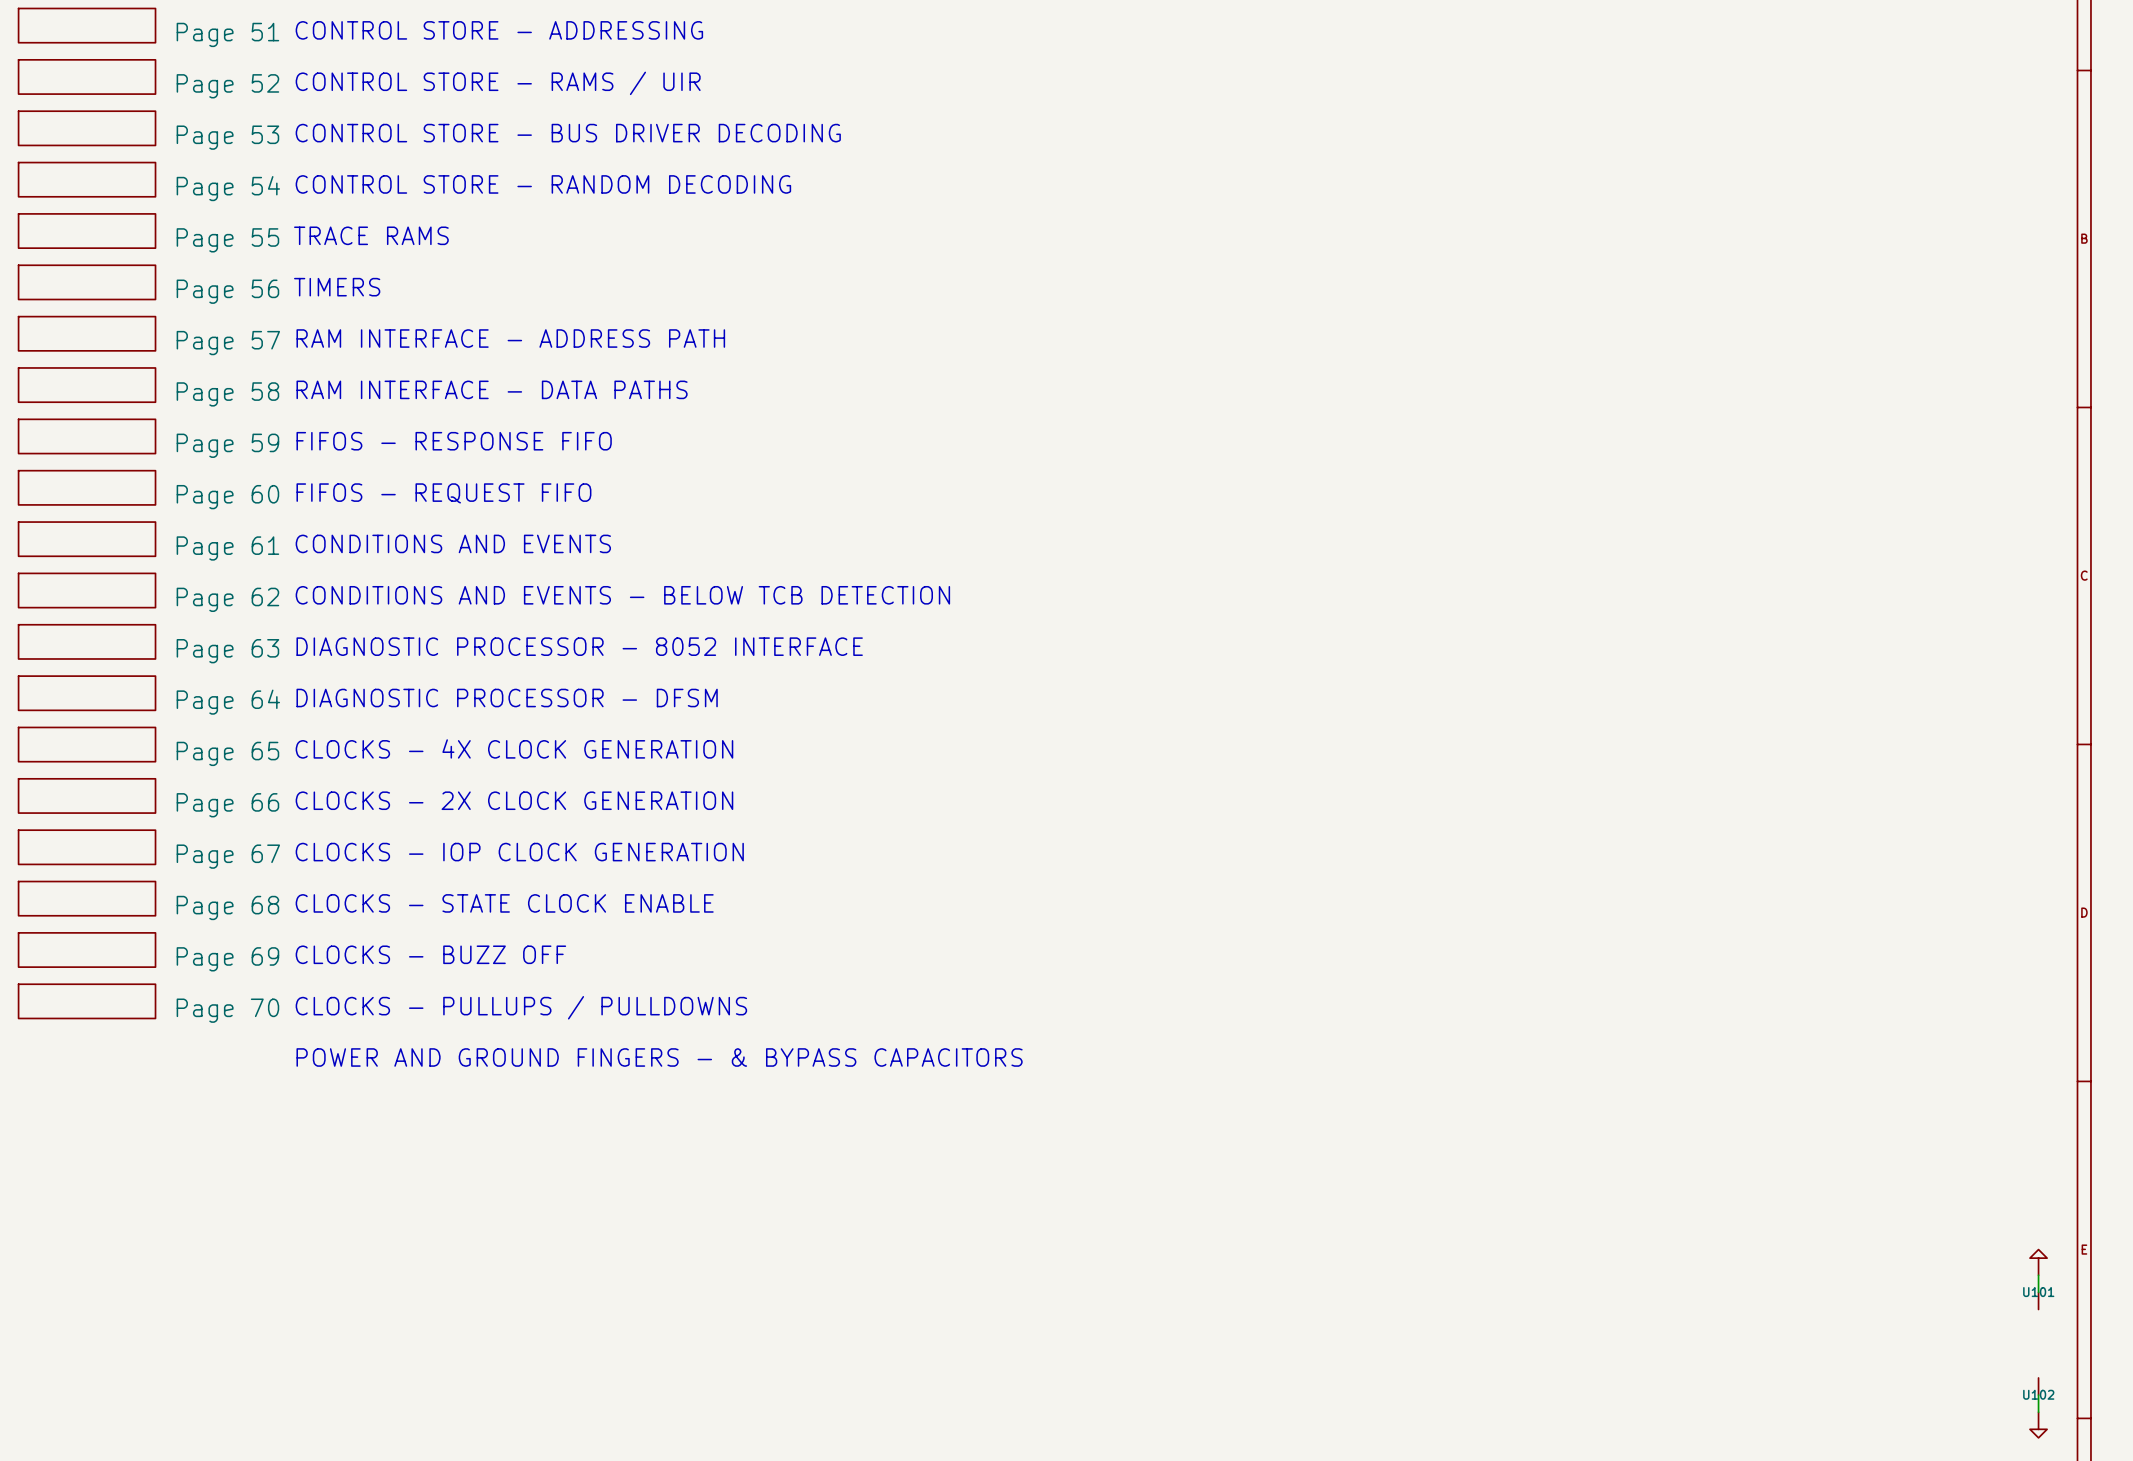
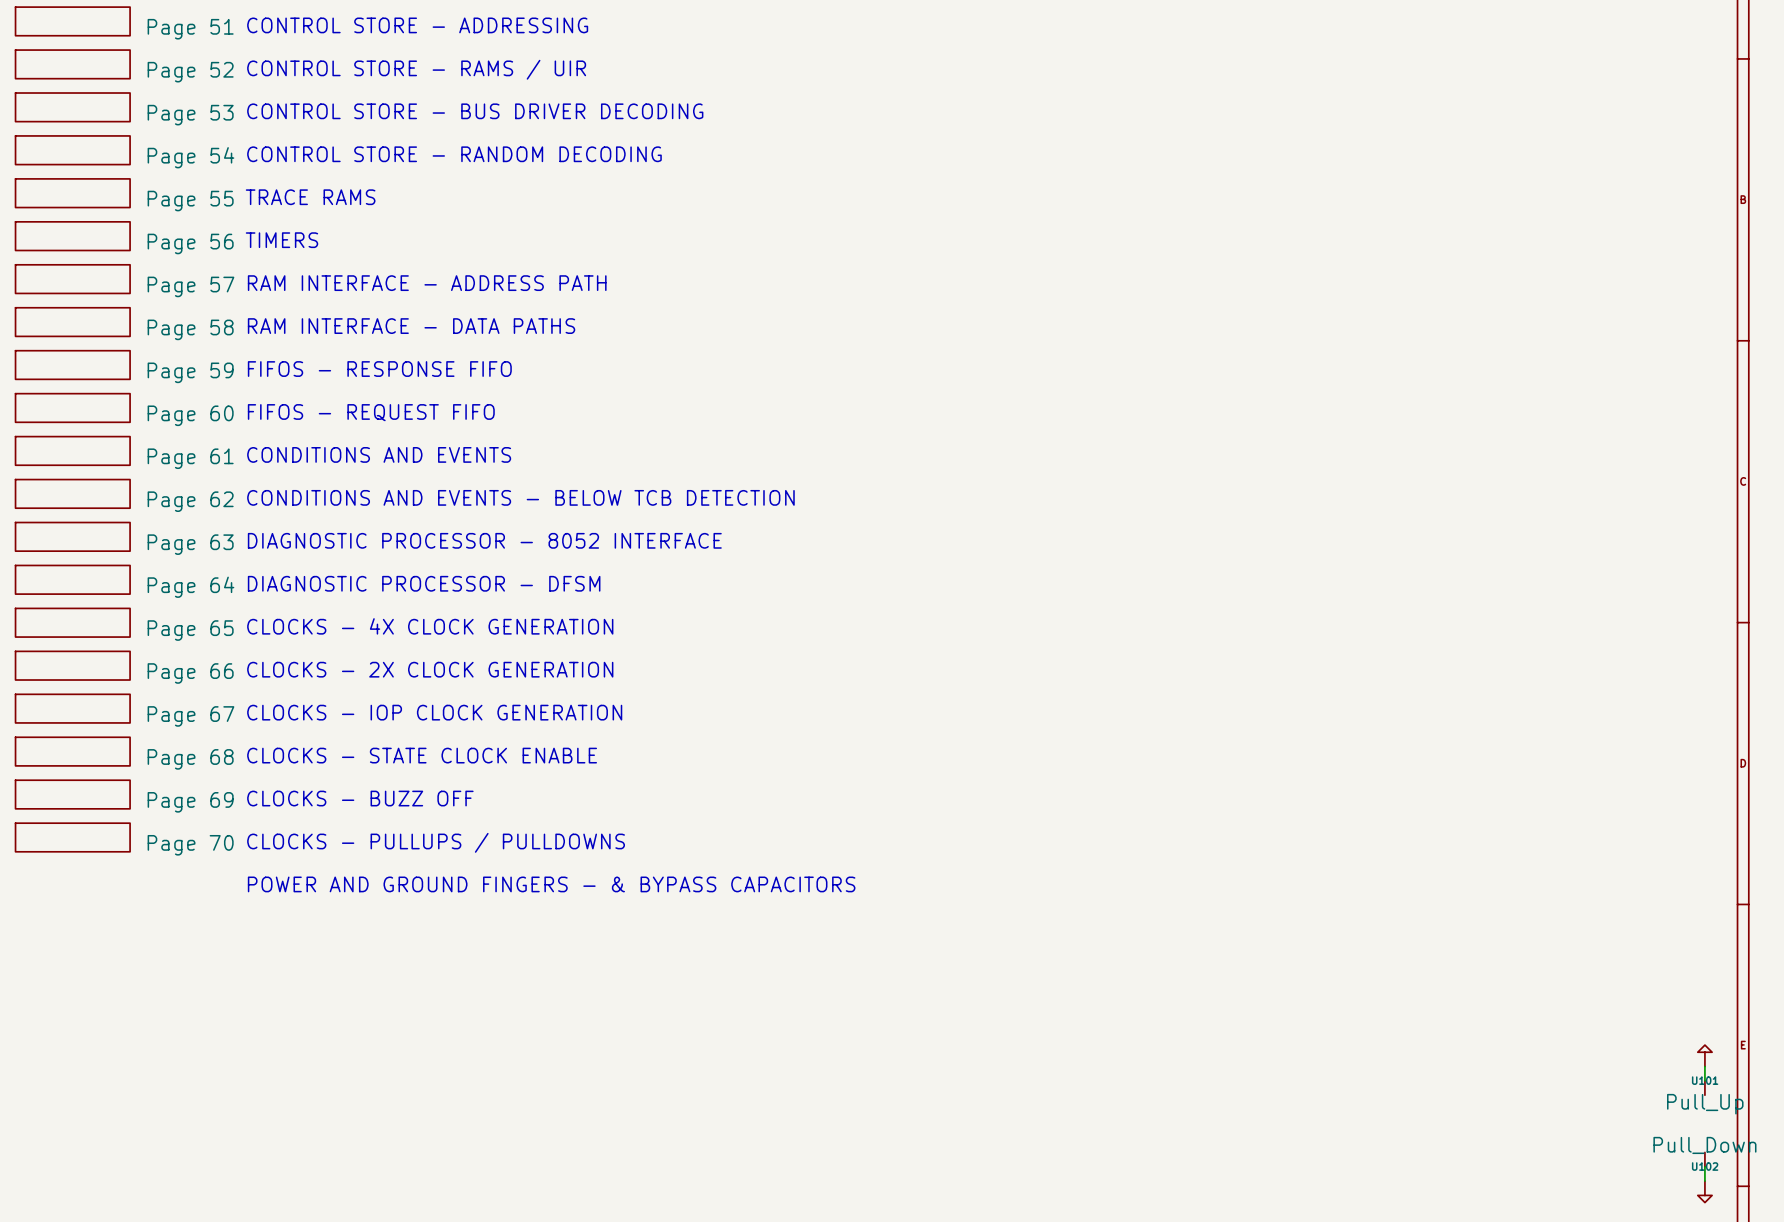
U101 value: none -> Pull_Up (1705, 1104)
U102 value: none -> Pull_Down (1704, 1145)

